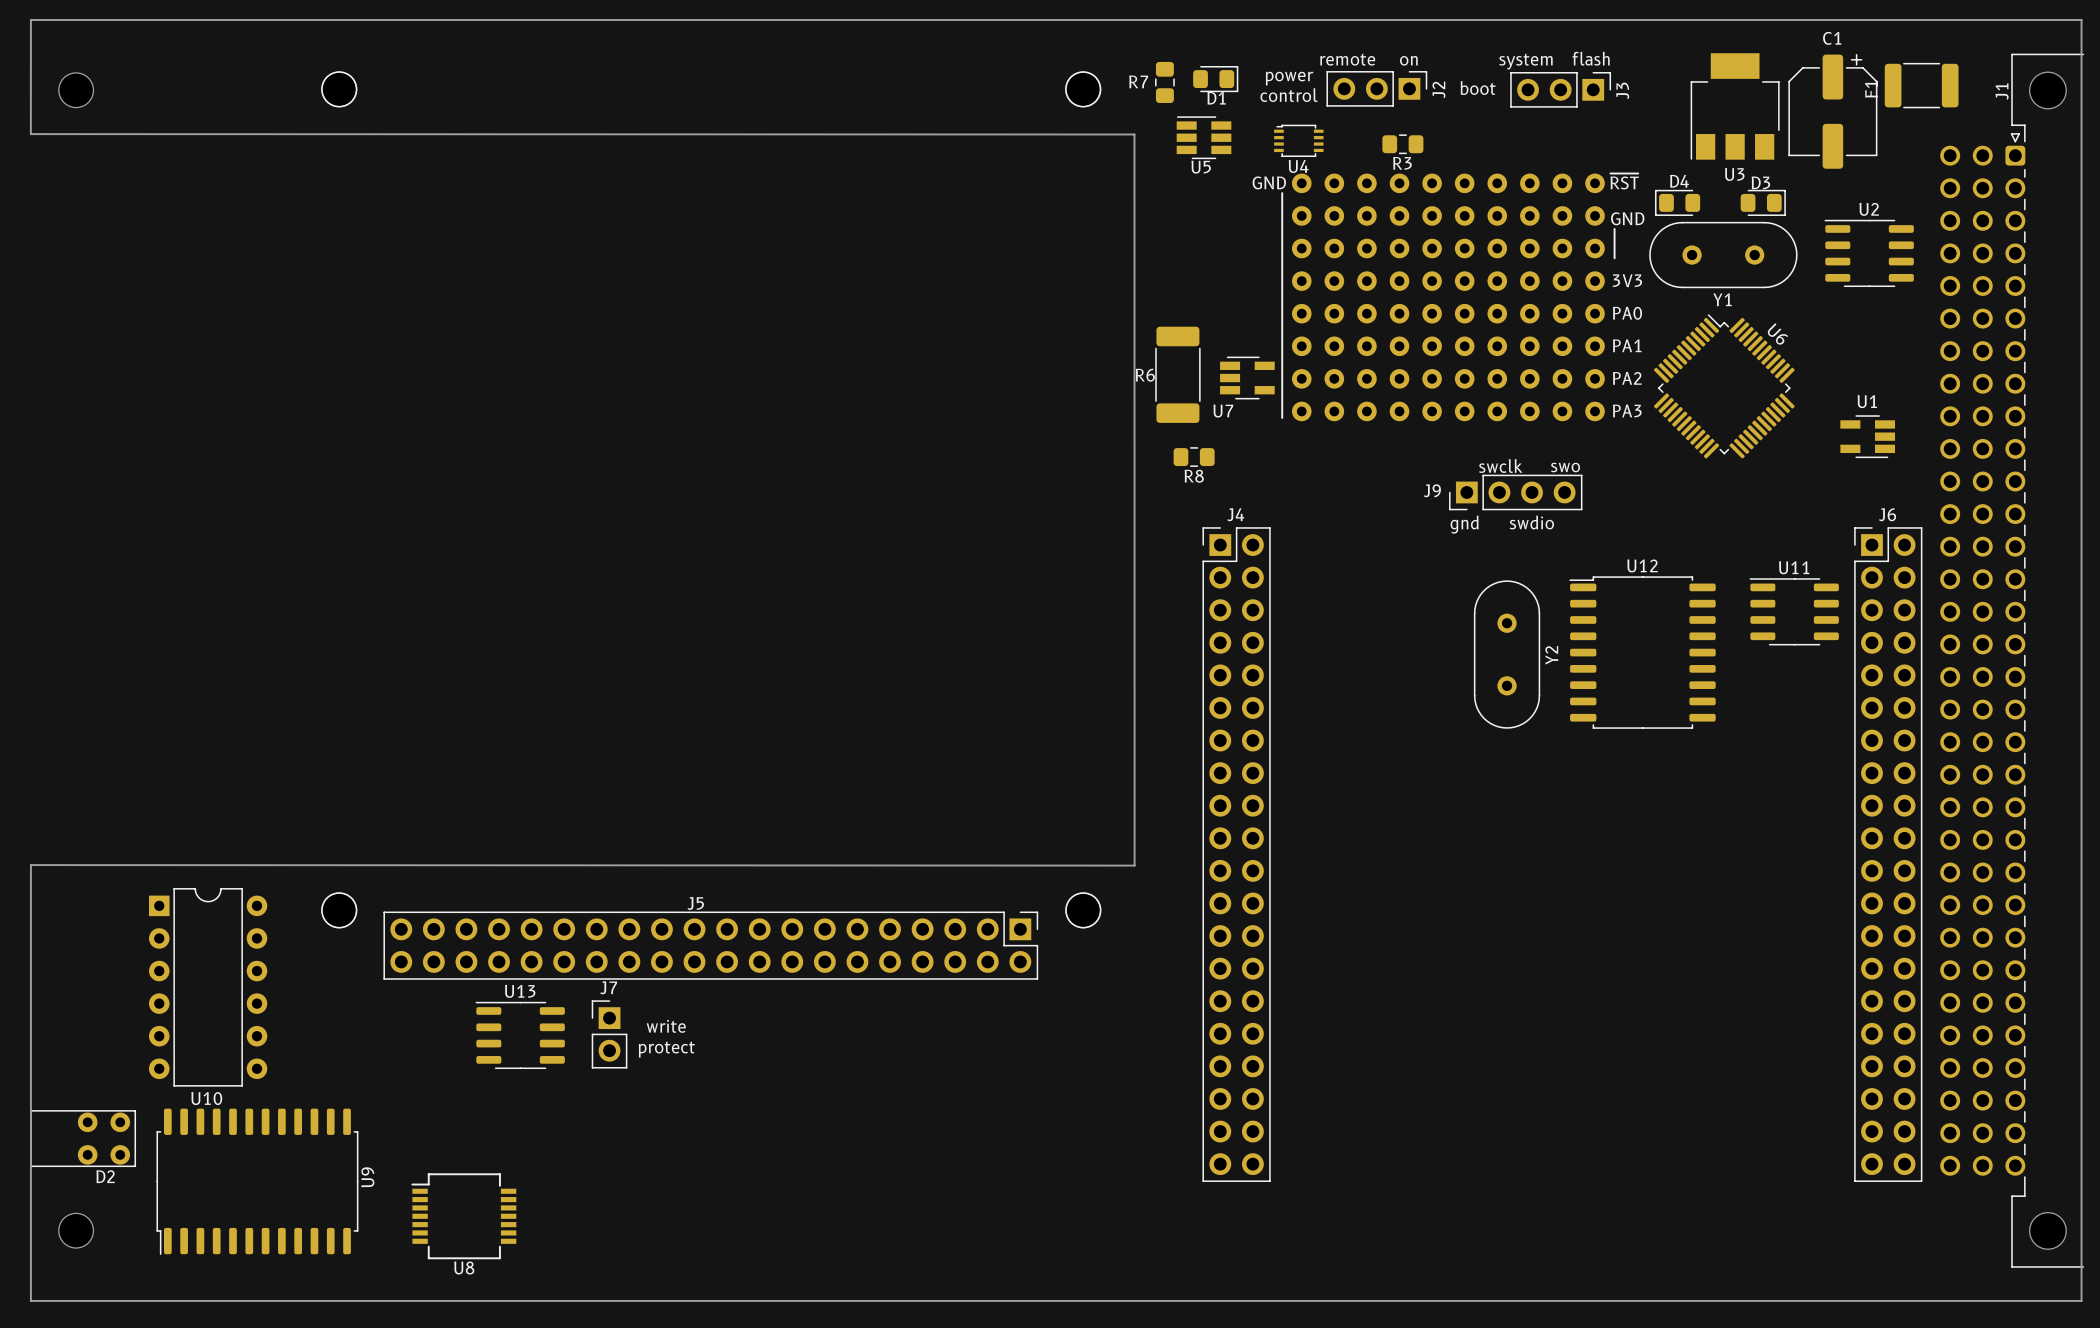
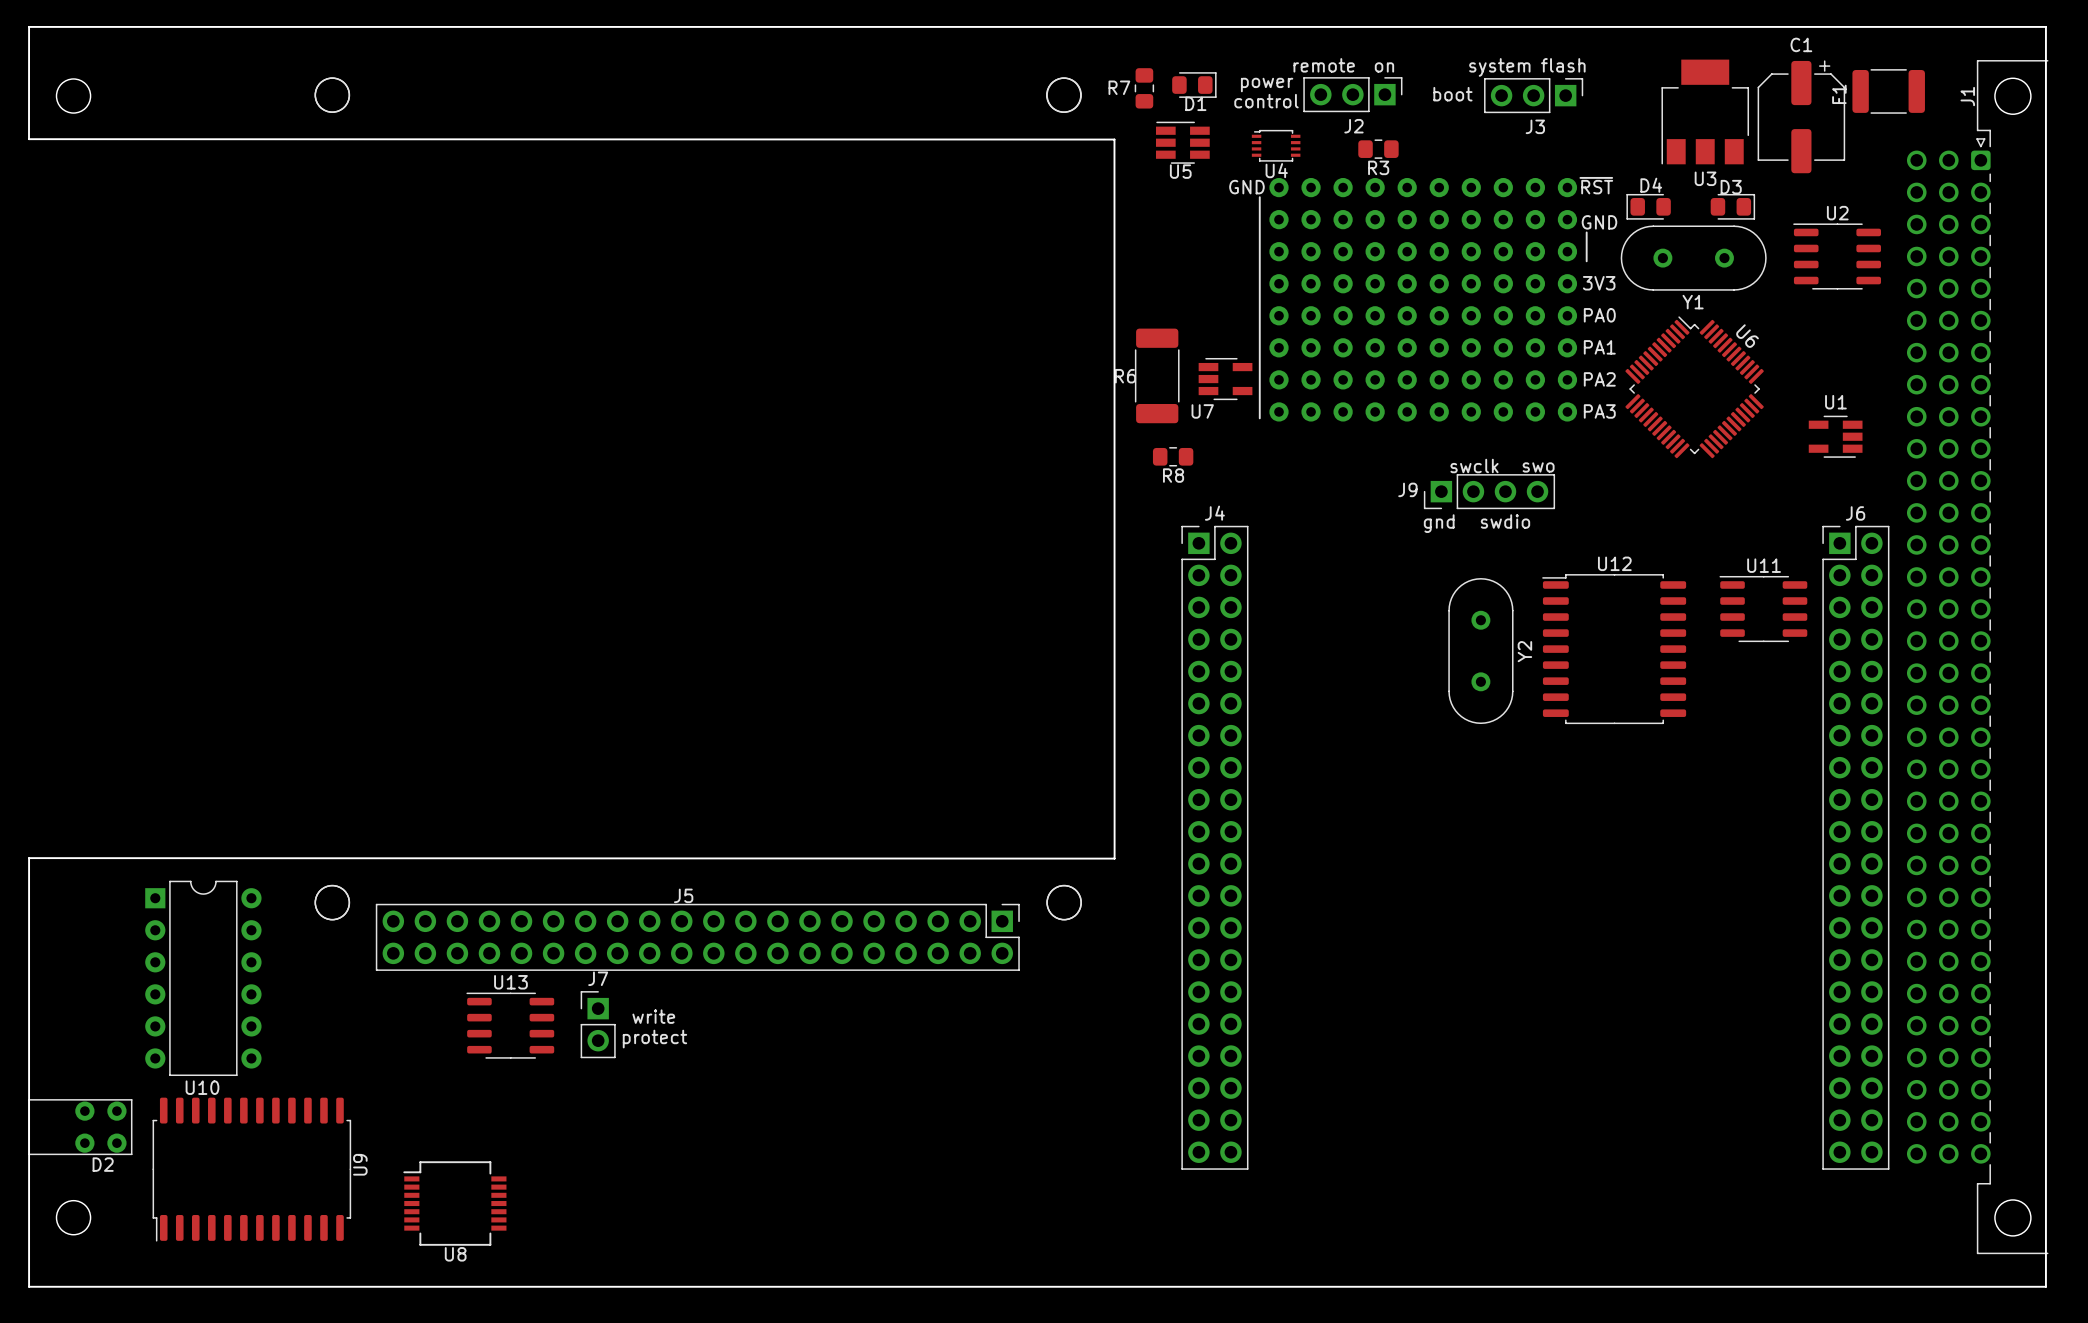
J2 name rotation: 0° (1438, 89) -> 90° clockwise (1353, 126)
J2 name position: J2 (1438, 89) -> J2 (1353, 126)
J3 name rotation: 0° (1622, 90) -> 90° clockwise (1535, 126)
J3 name position: J3 (1622, 90) -> J3 (1535, 126)

